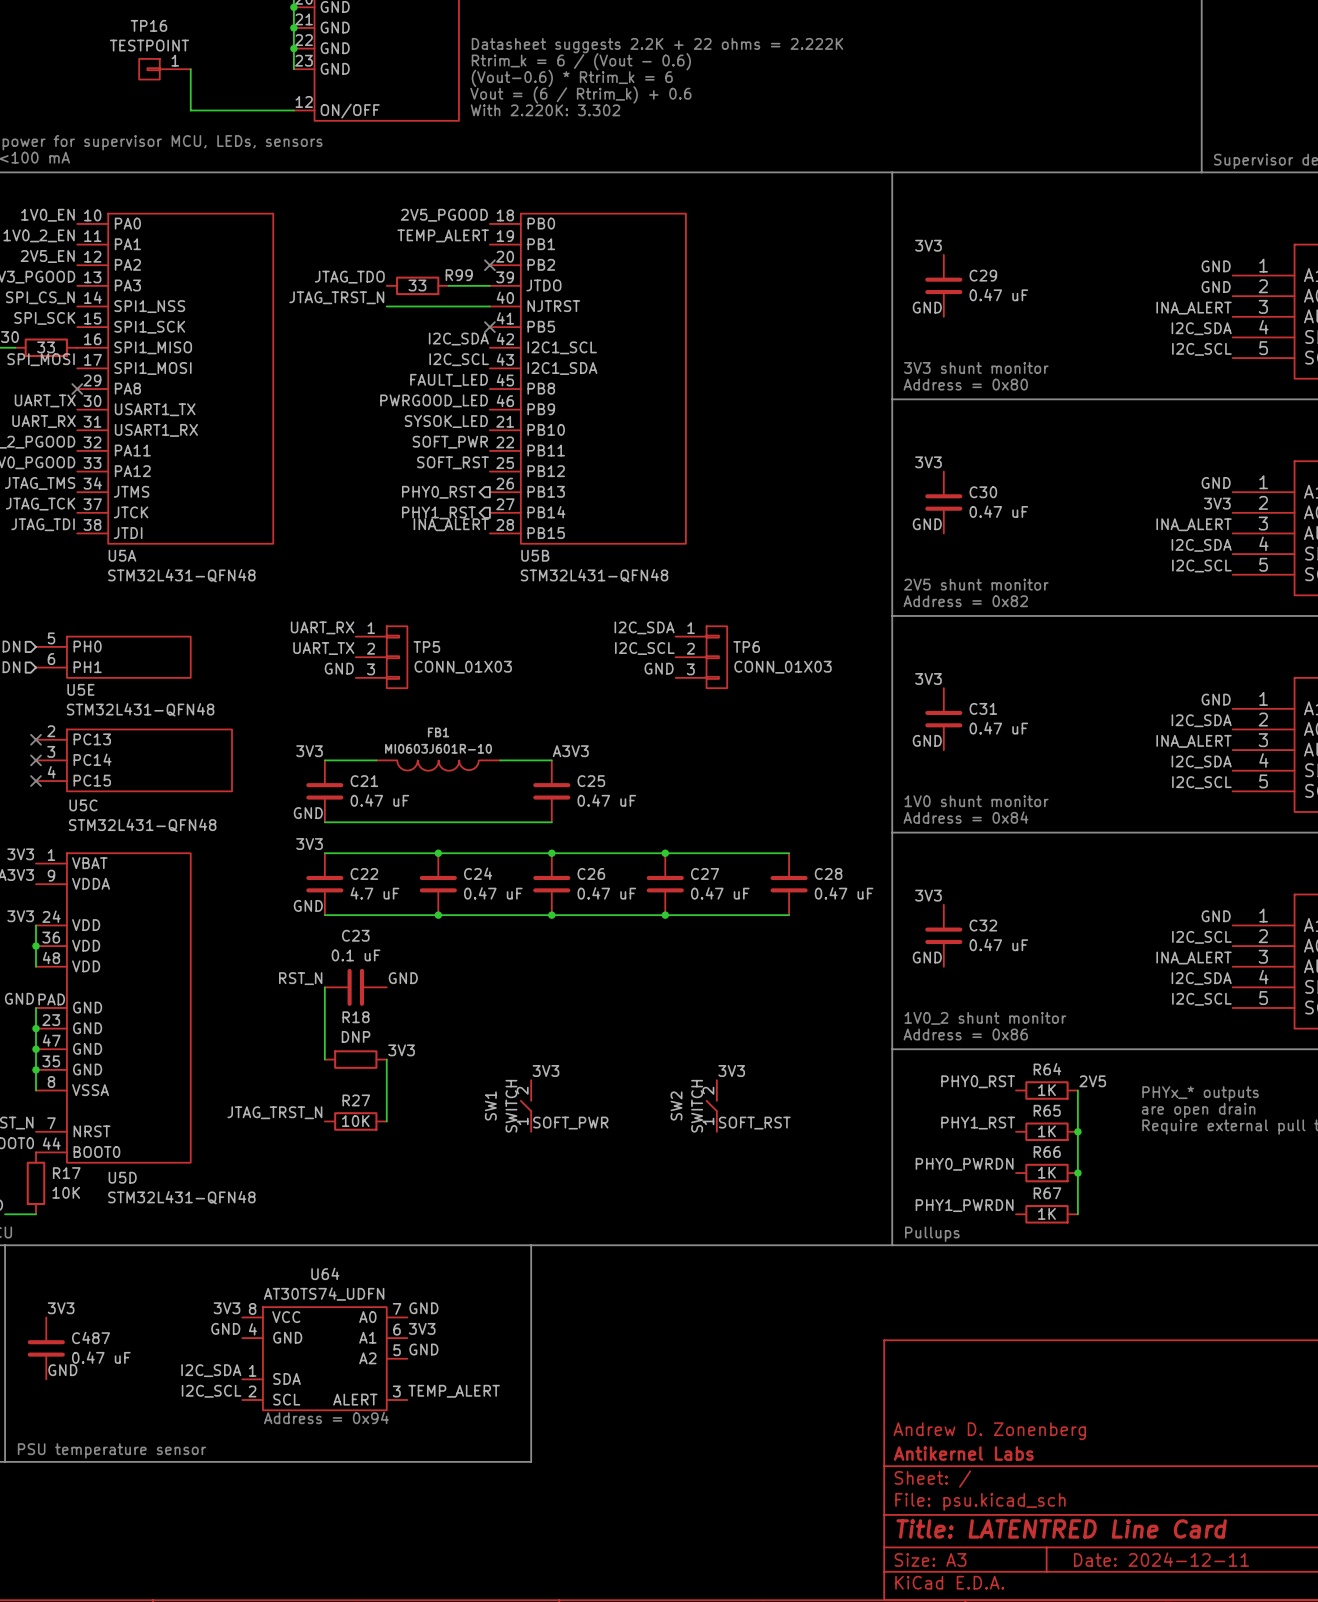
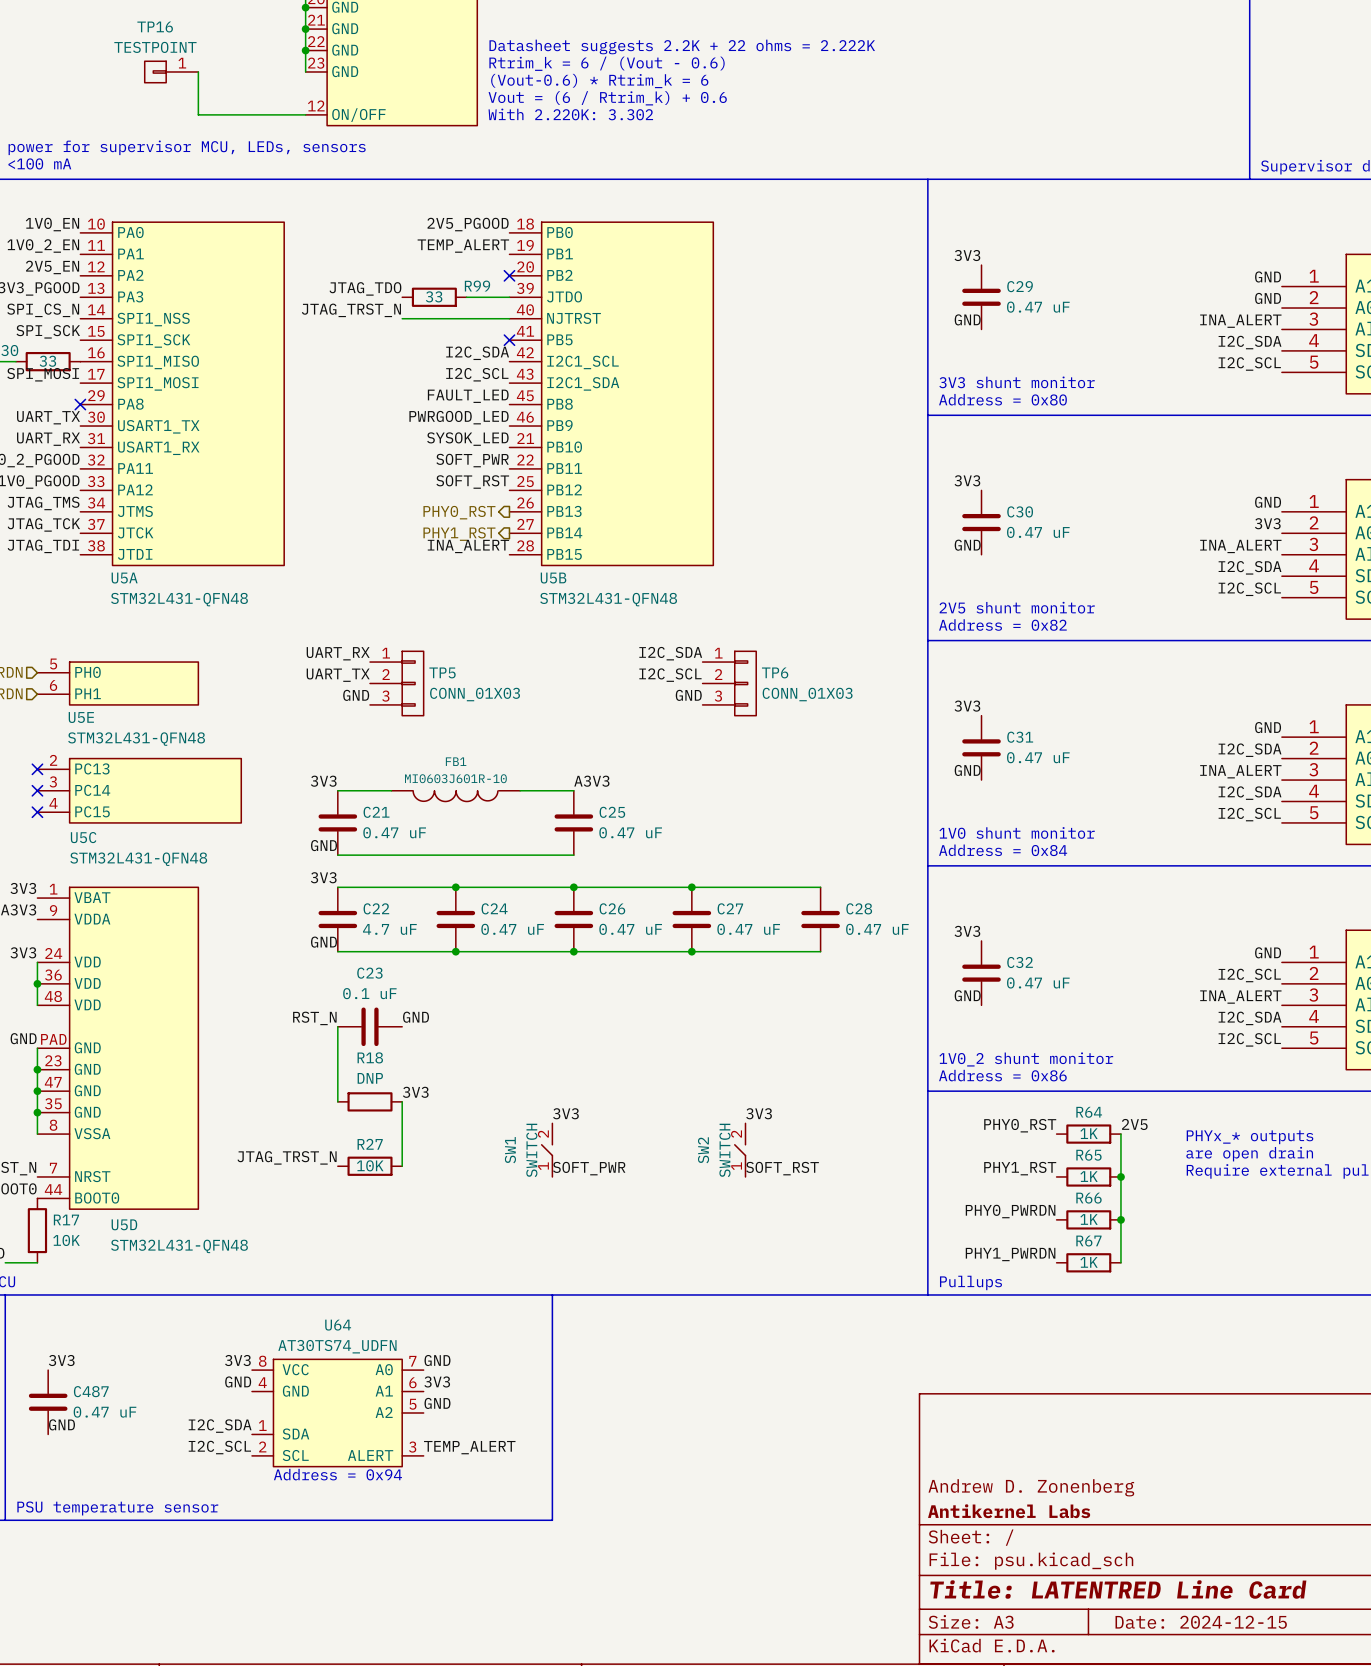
title block: Date: 2024-12-11 (1161, 1559) -> Date: 2024-12-15 (1201, 1622)

